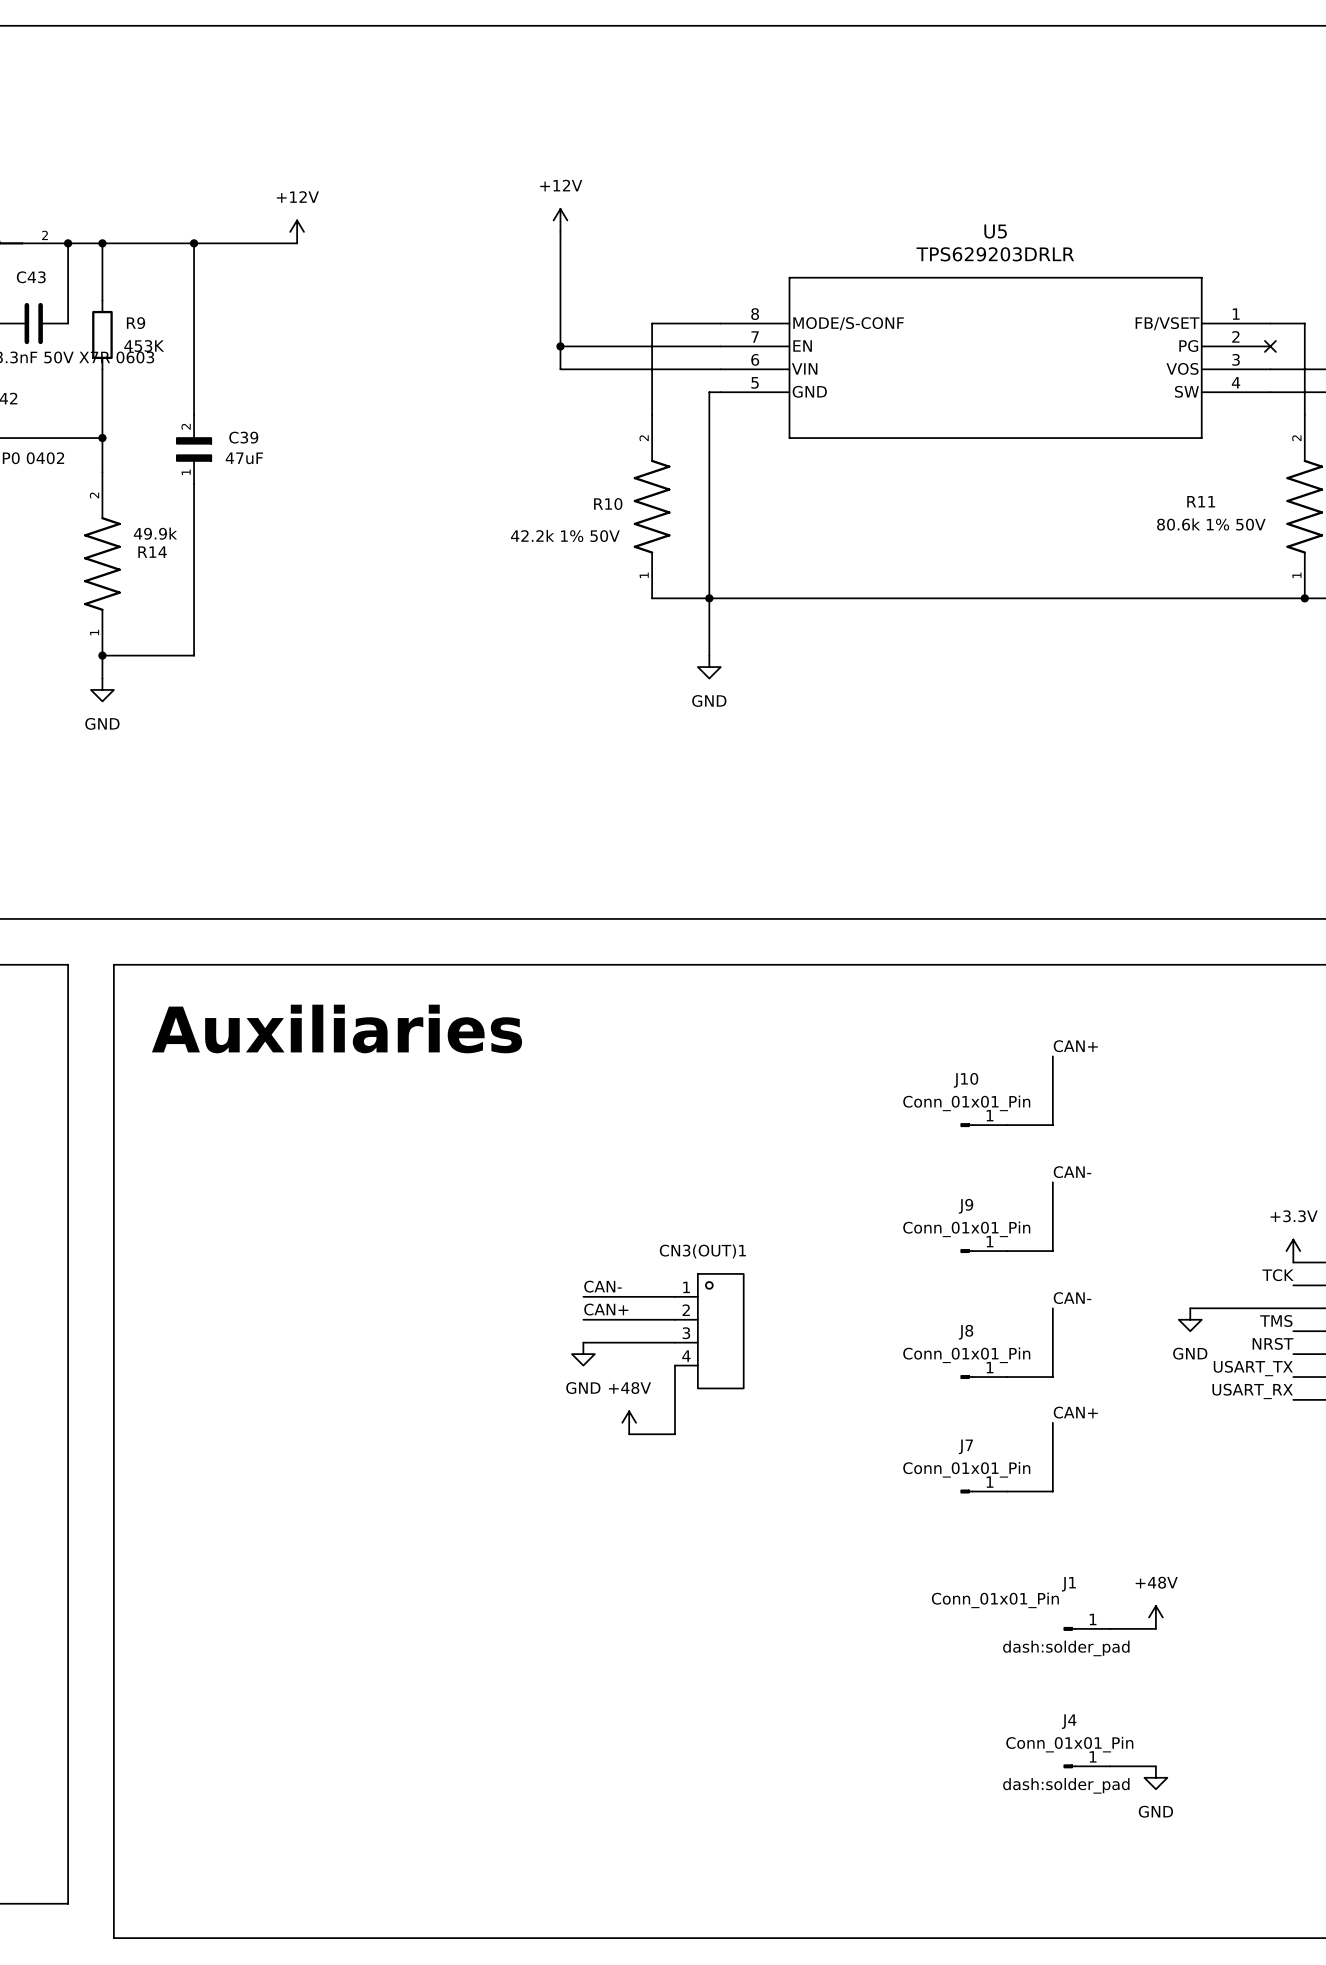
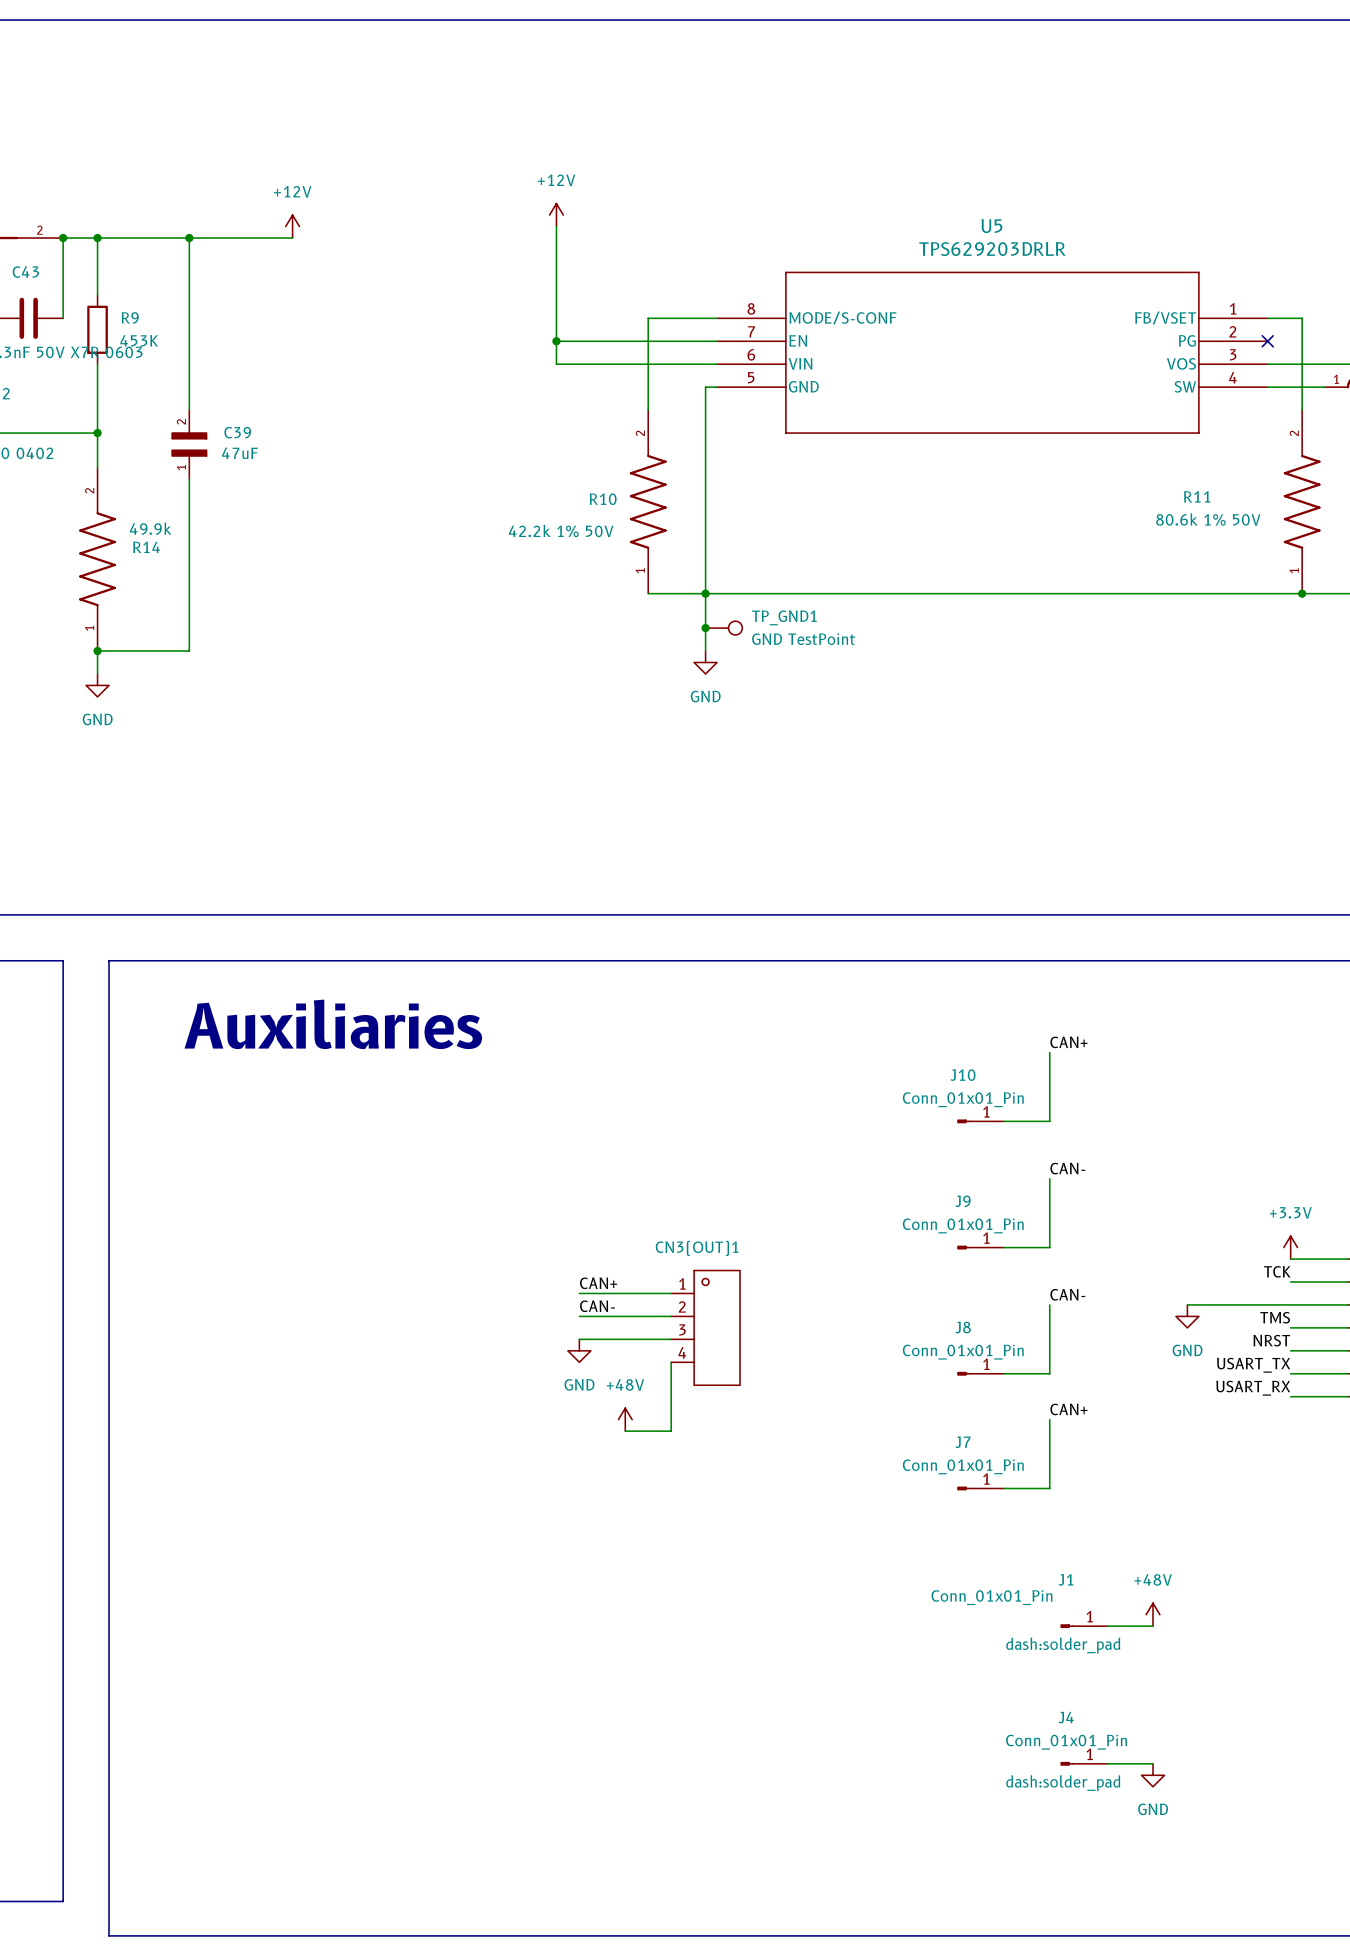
junction: none -> (705, 628)
TP_GND1: none -> GND TestPoint (723, 628)
label: CAN- (603, 1286) -> CAN+ (598, 1283)
label: CAN+ (606, 1309) -> CAN- (597, 1306)

